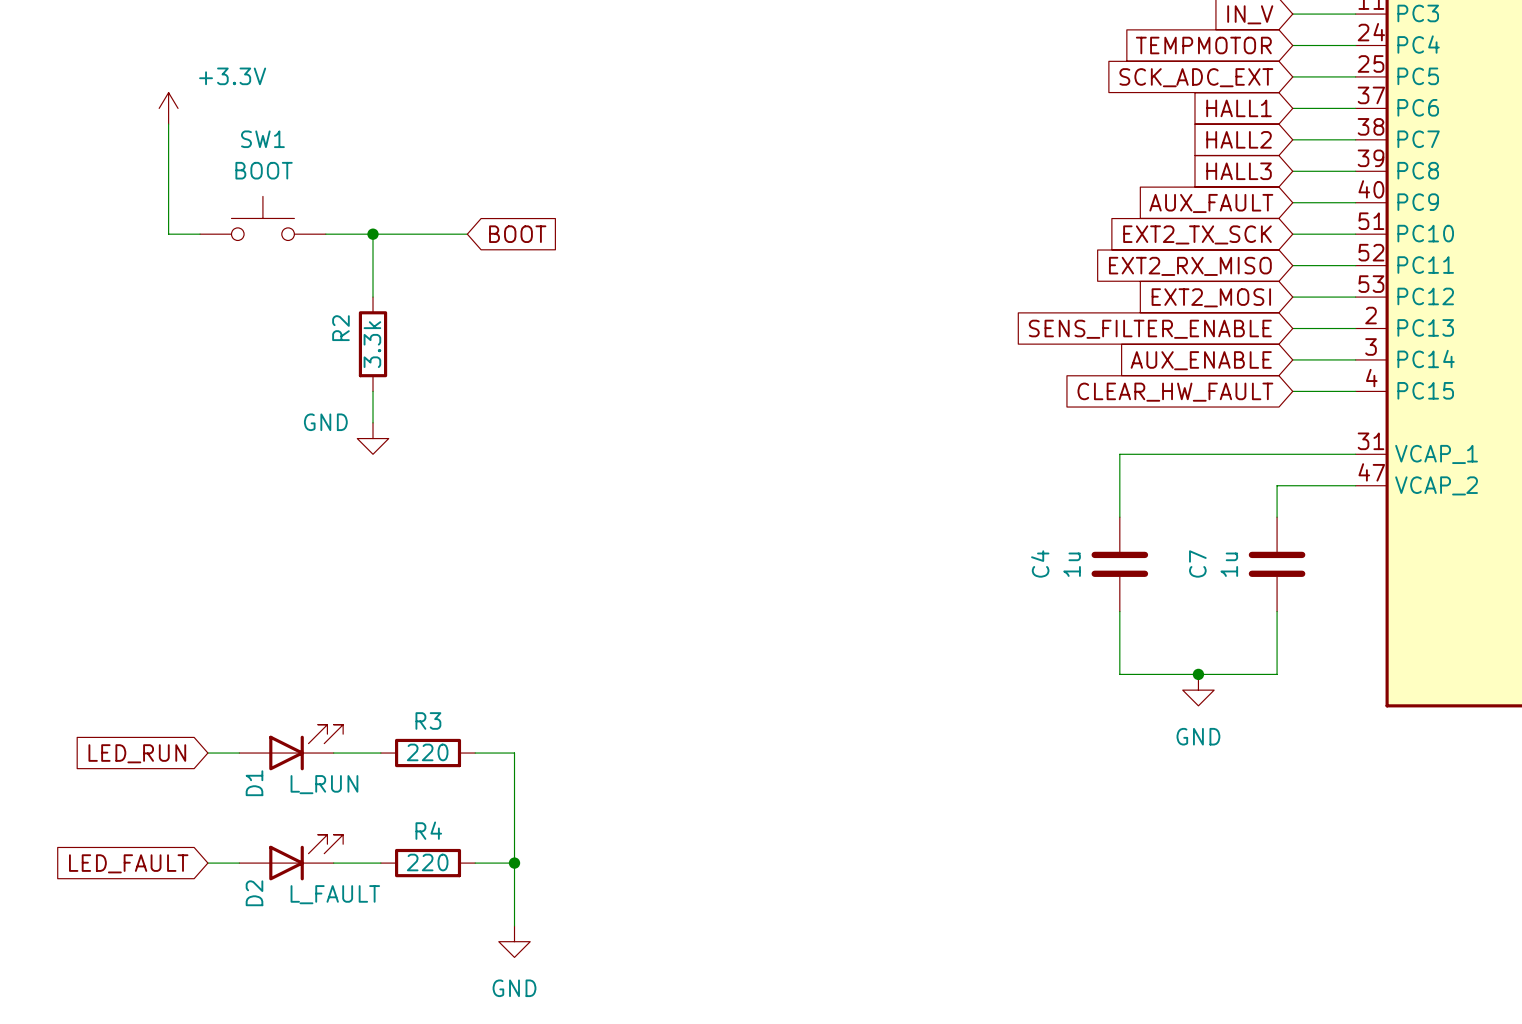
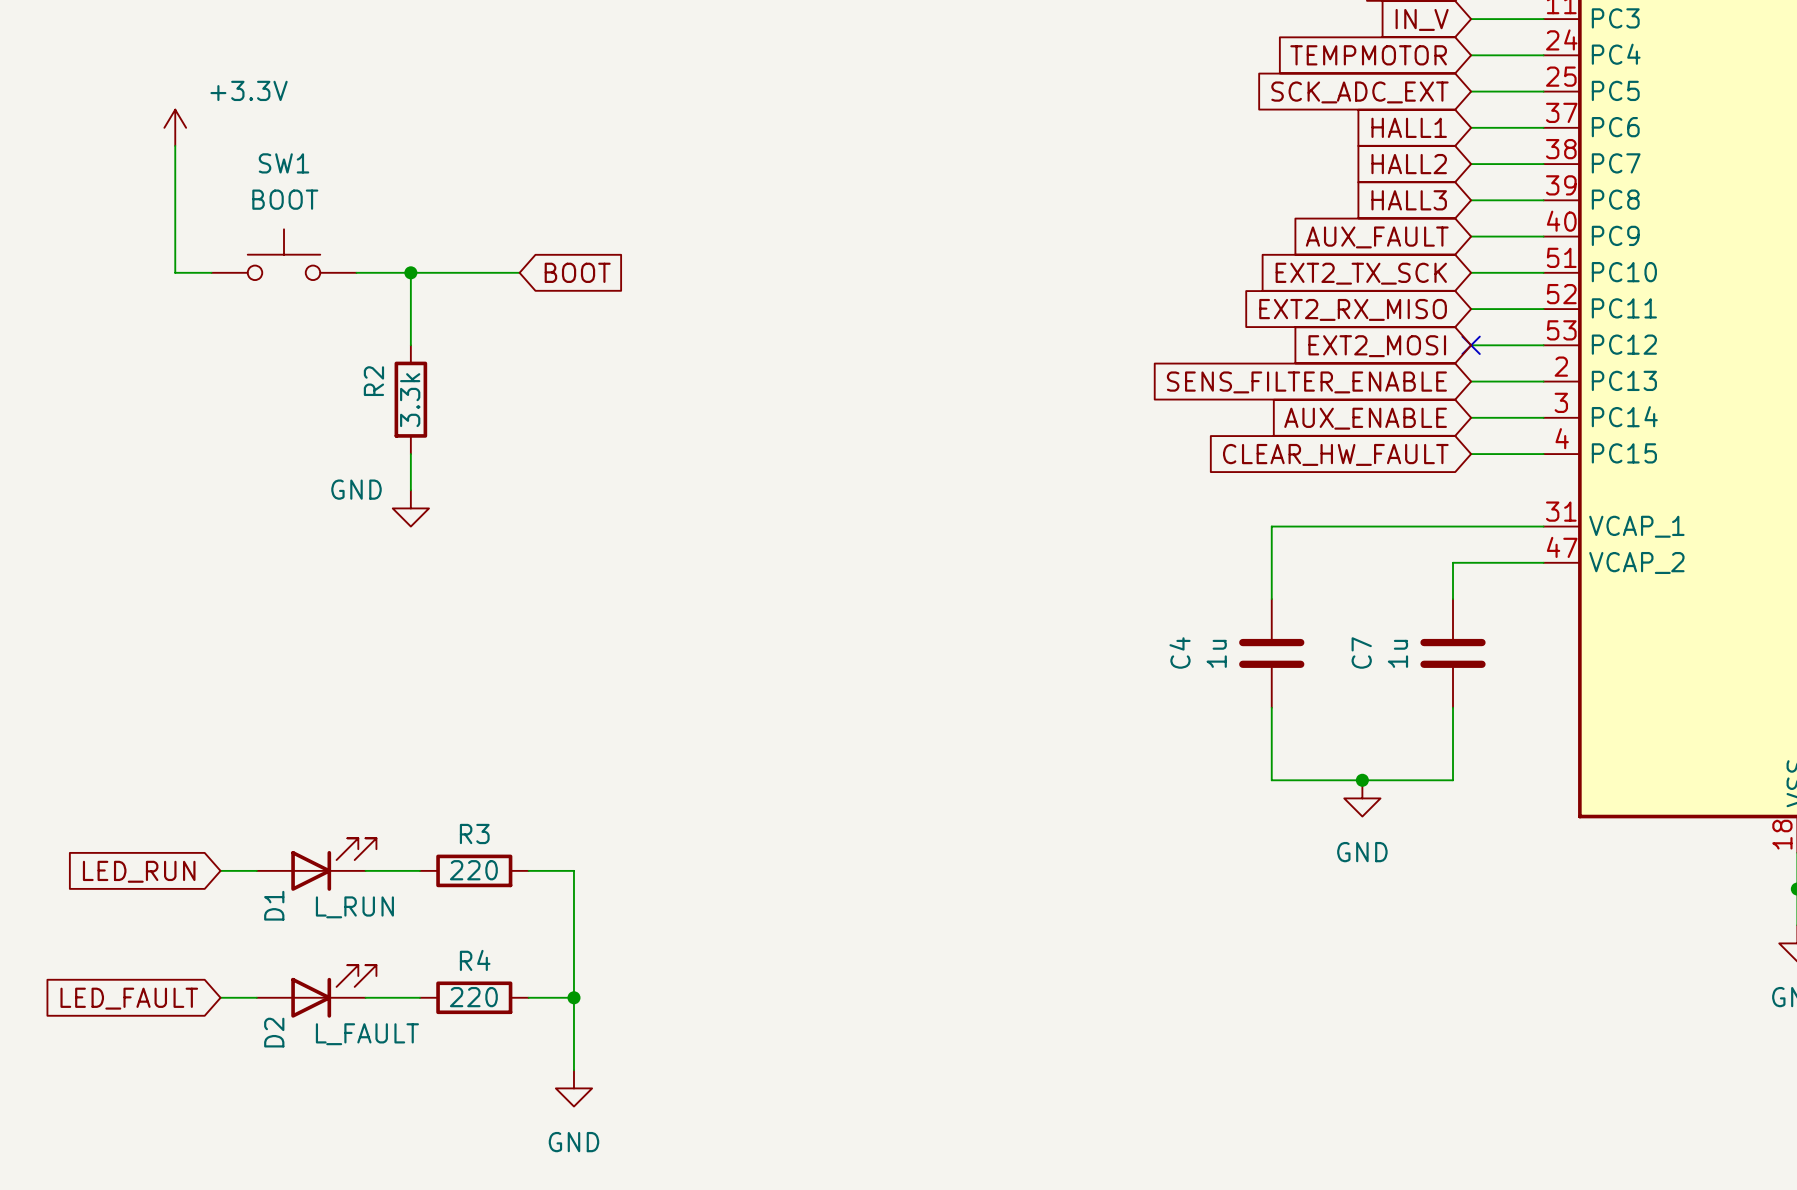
no-connect mark: none -> (1471, 345)

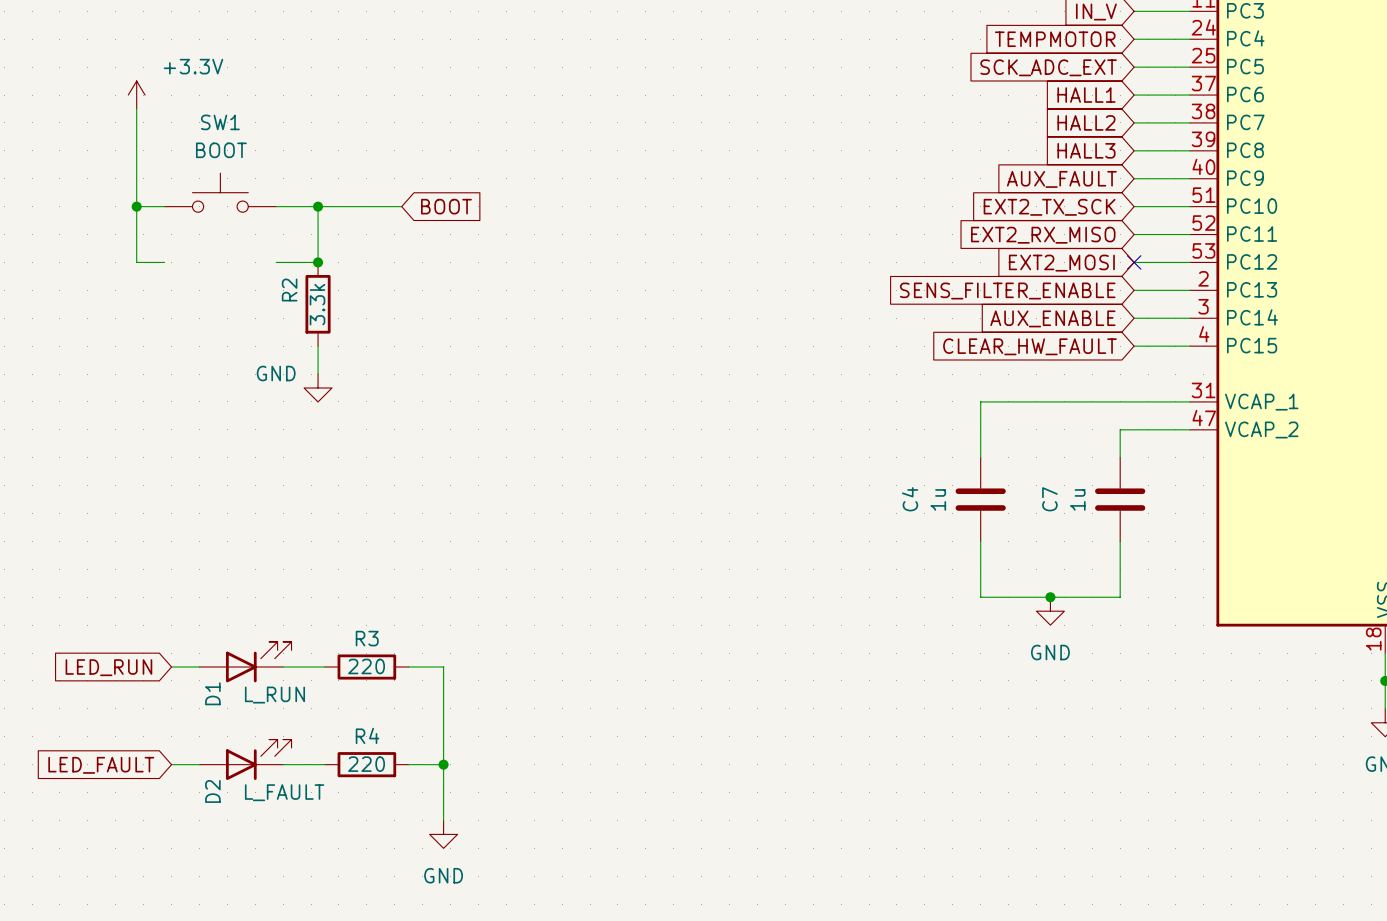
wire: none -> (136, 206) (136, 262) (164, 262)
junction: none -> (136, 206)
wire: none -> (276, 262) (318, 262)
junction: none -> (318, 262)

